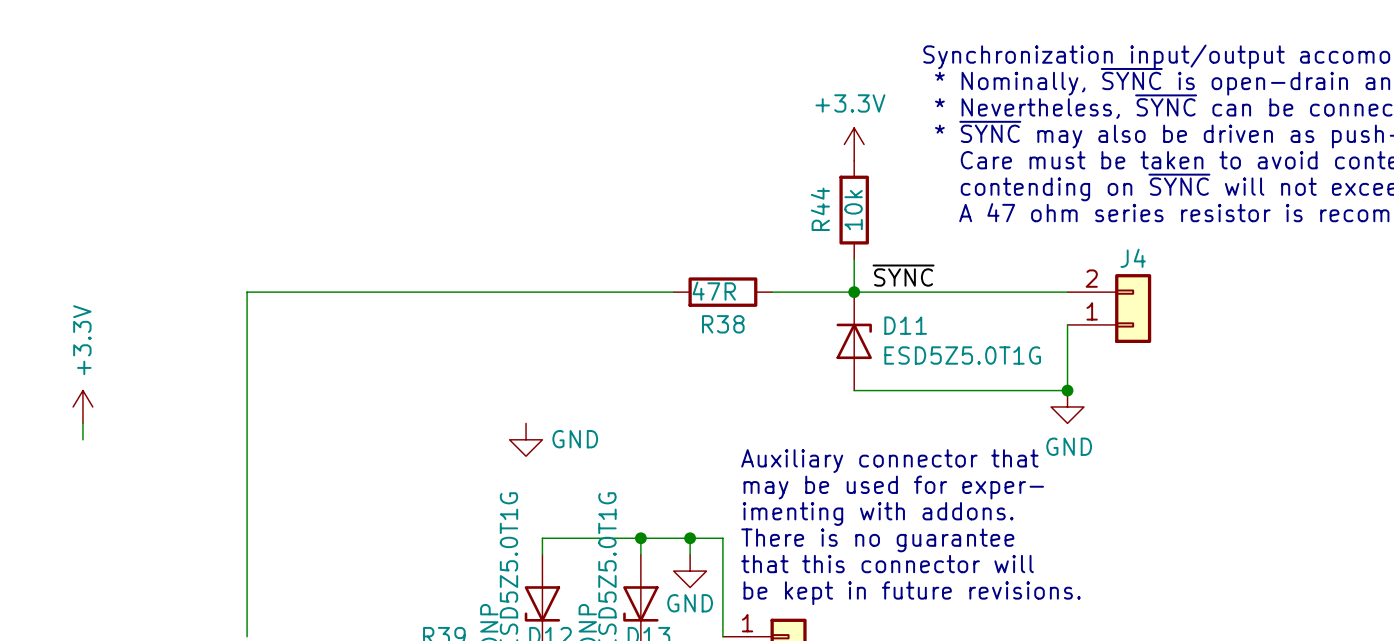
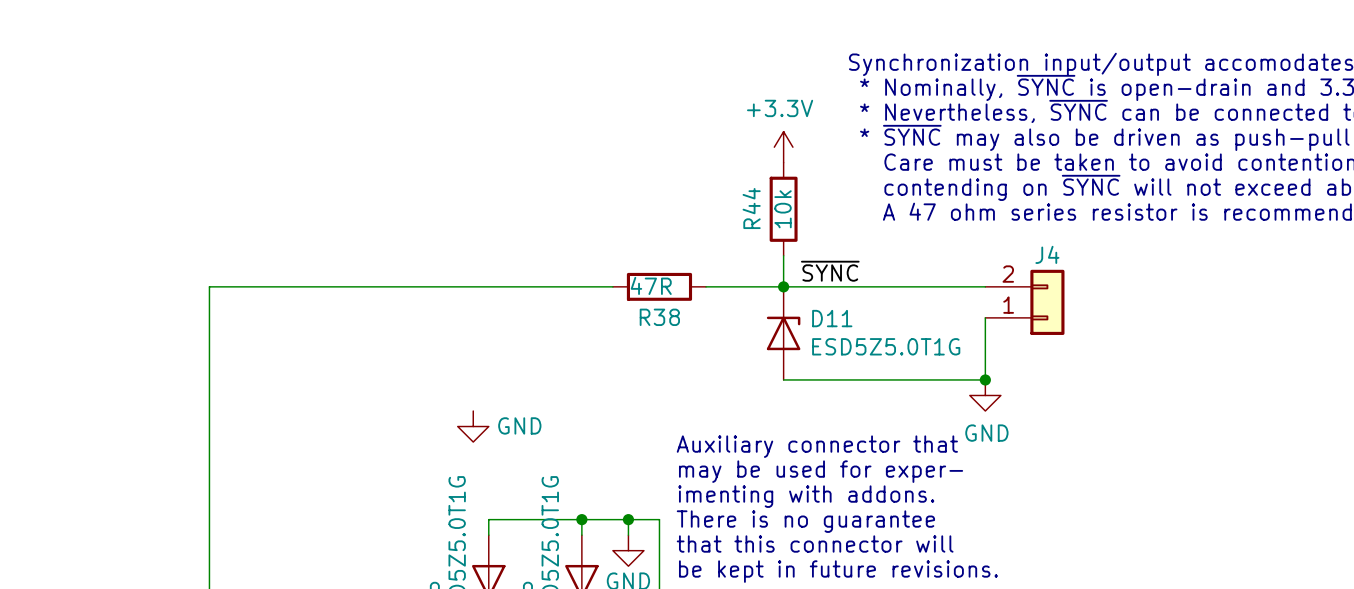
power symbol: +3.3V (82, 406) -> none
wire: (82, 423) (82, 439) -> none

